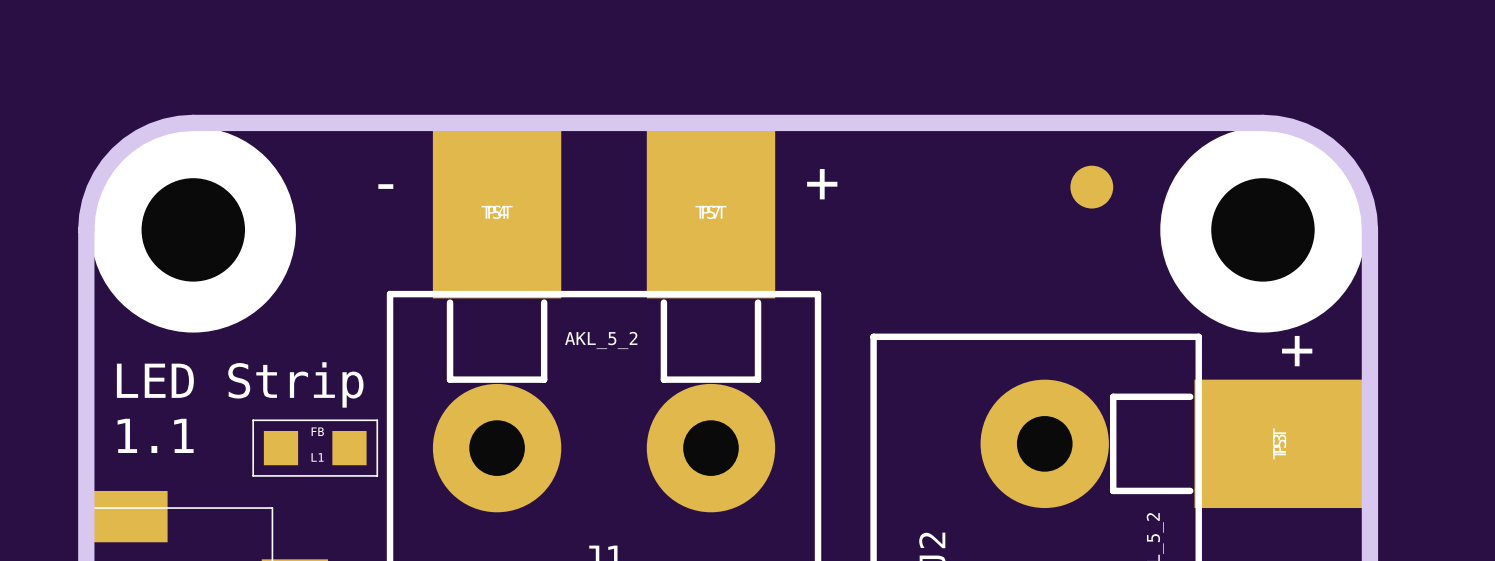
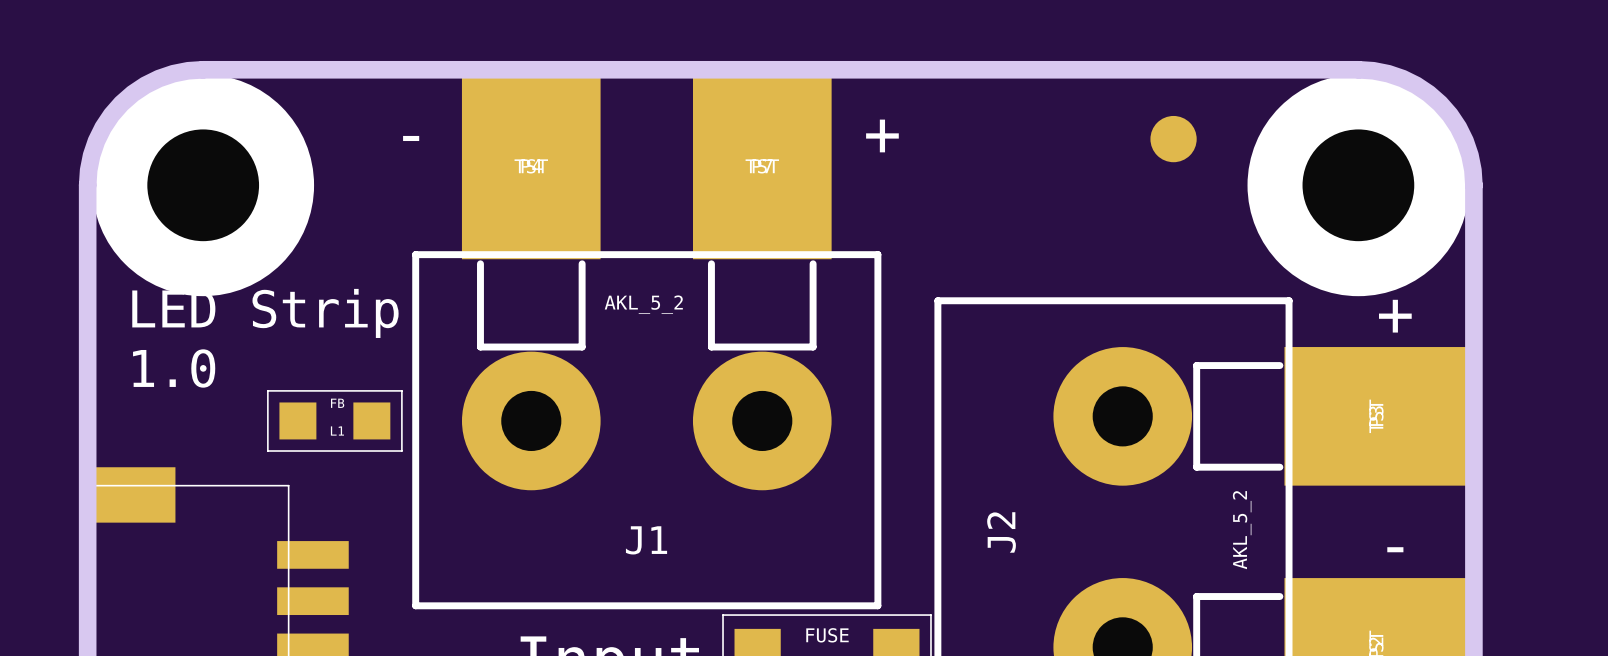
part footprint: [90, 127, 296, 333] -> [92, 74, 315, 297]
text position: LED Strip (240, 384) -> LED Strip (265, 313)
text: 1.1 (155, 435) -> 1.0 (174, 368)

